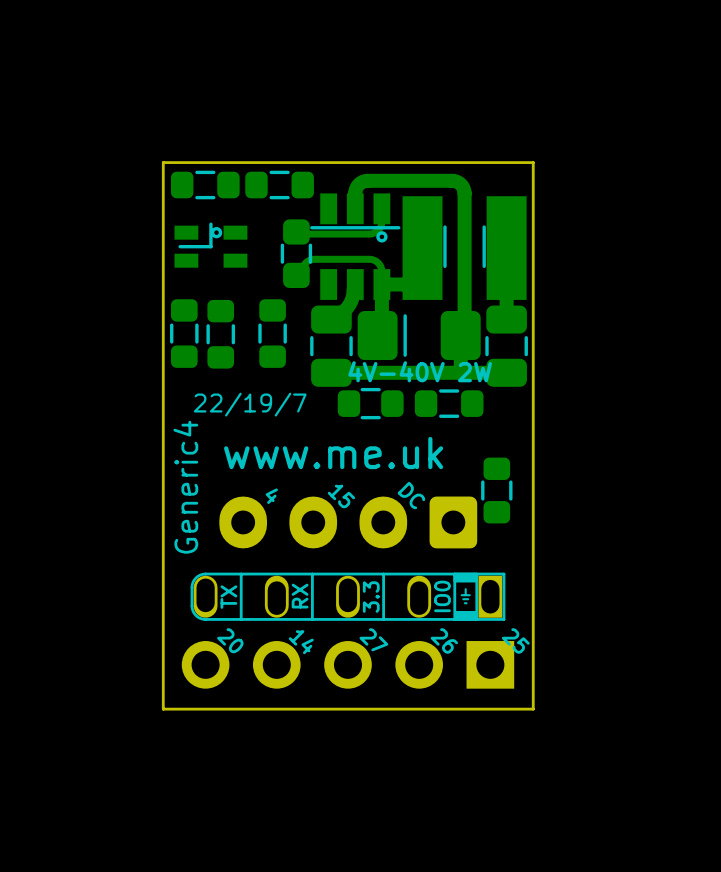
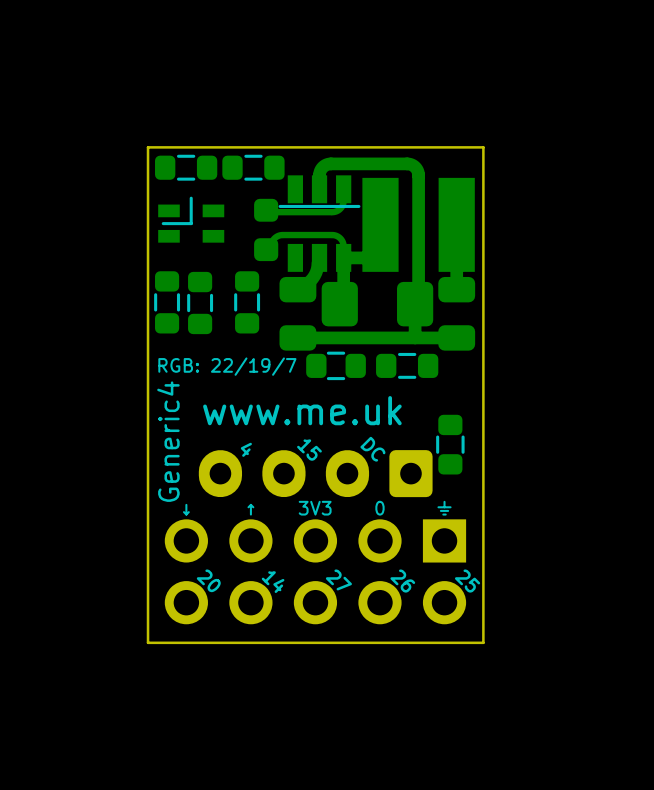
part footprint: [283, 173, 527, 387] -> [254, 157, 476, 351]
part footprint: [174, 222, 248, 268] -> [158, 196, 225, 243]
drawing: [443, 225, 486, 268] -> none
drawing: [280, 243, 313, 264] -> none
drawing: [403, 314, 407, 357] -> none
drawing: [310, 336, 353, 357] -> none
drawing: [485, 336, 528, 357] -> none
text: 22/19/7 (250, 404) -> RGB: 22/19/7 (227, 366)
part footprint: [190, 572, 506, 621] -> [164, 519, 467, 563]
part footprint: [181, 641, 515, 689] -> [164, 581, 467, 625]

